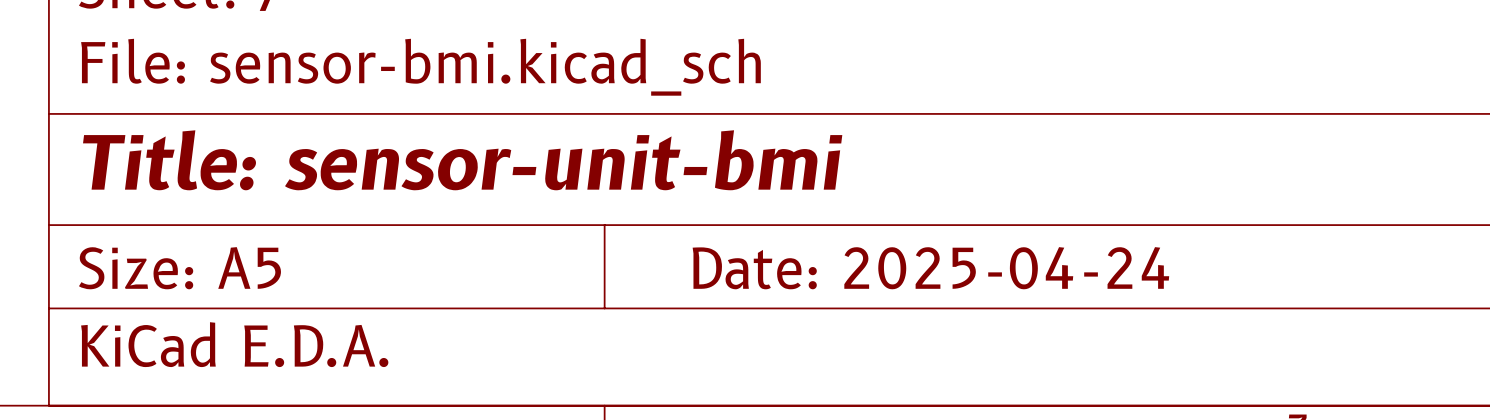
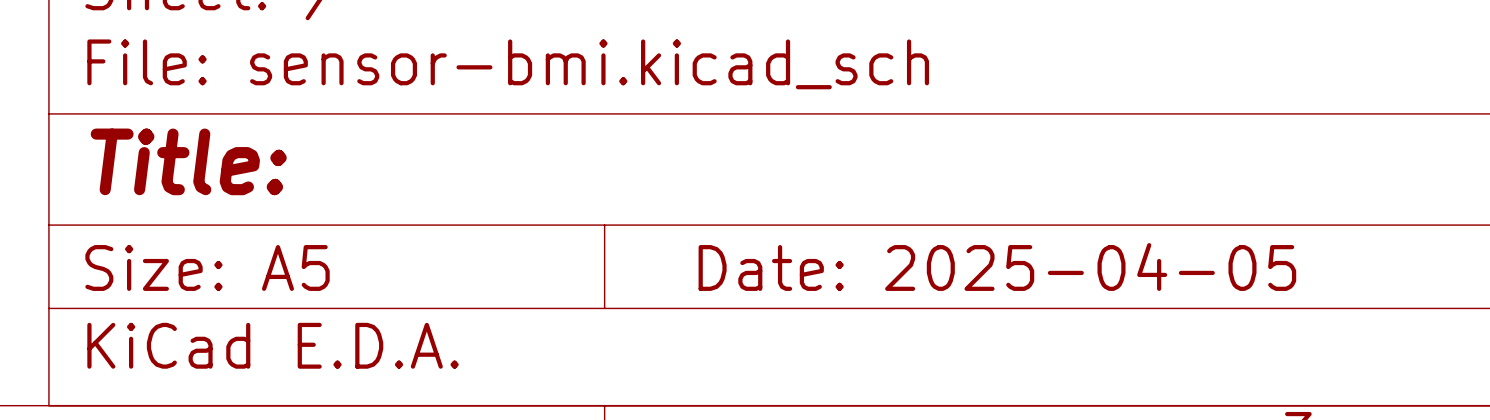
title block: Title: sensor-unit-bmi (462, 160) -> Title: (188, 161)
title block: Date: 2025-04-24 (930, 268) -> Date: 2025-04-05 (997, 266)

